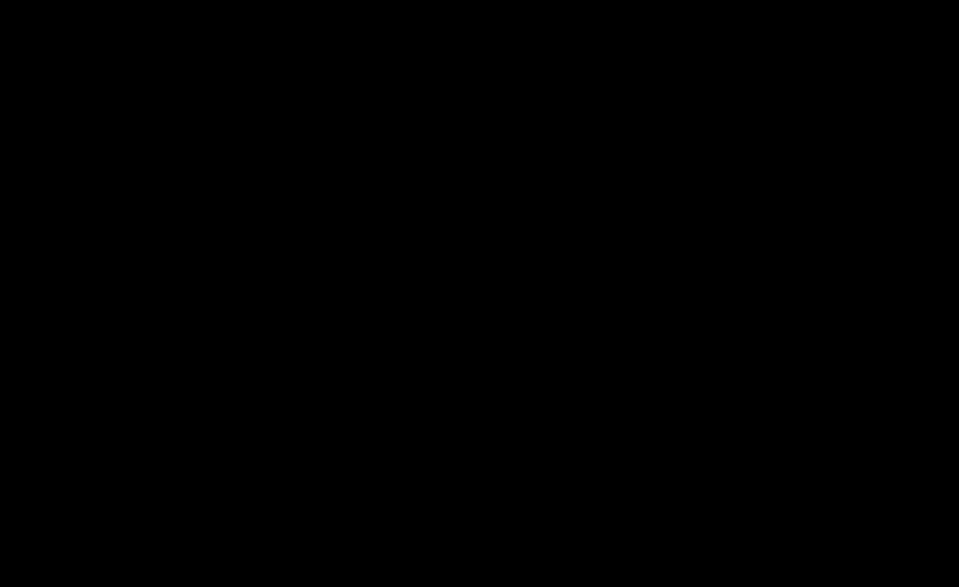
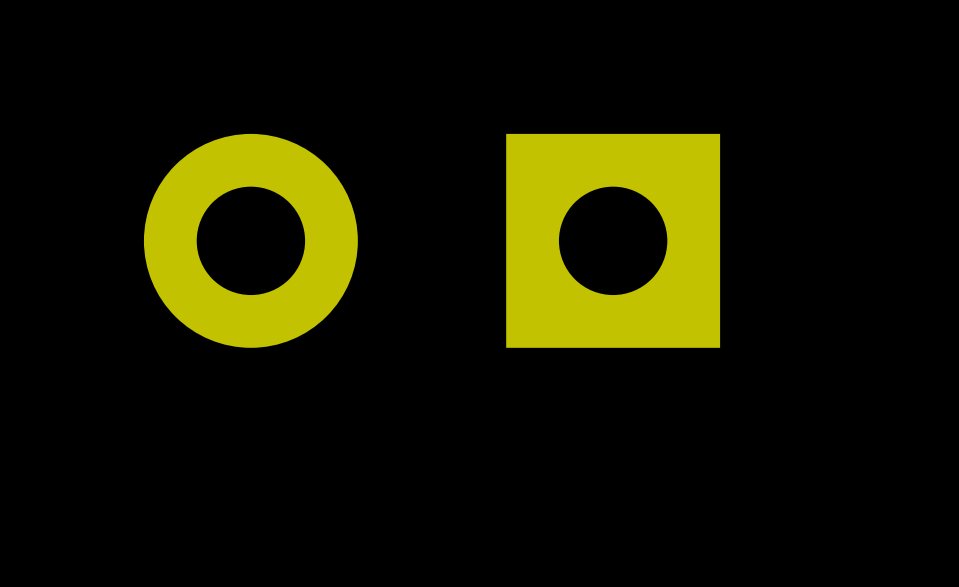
part: none -> (432, 240)

